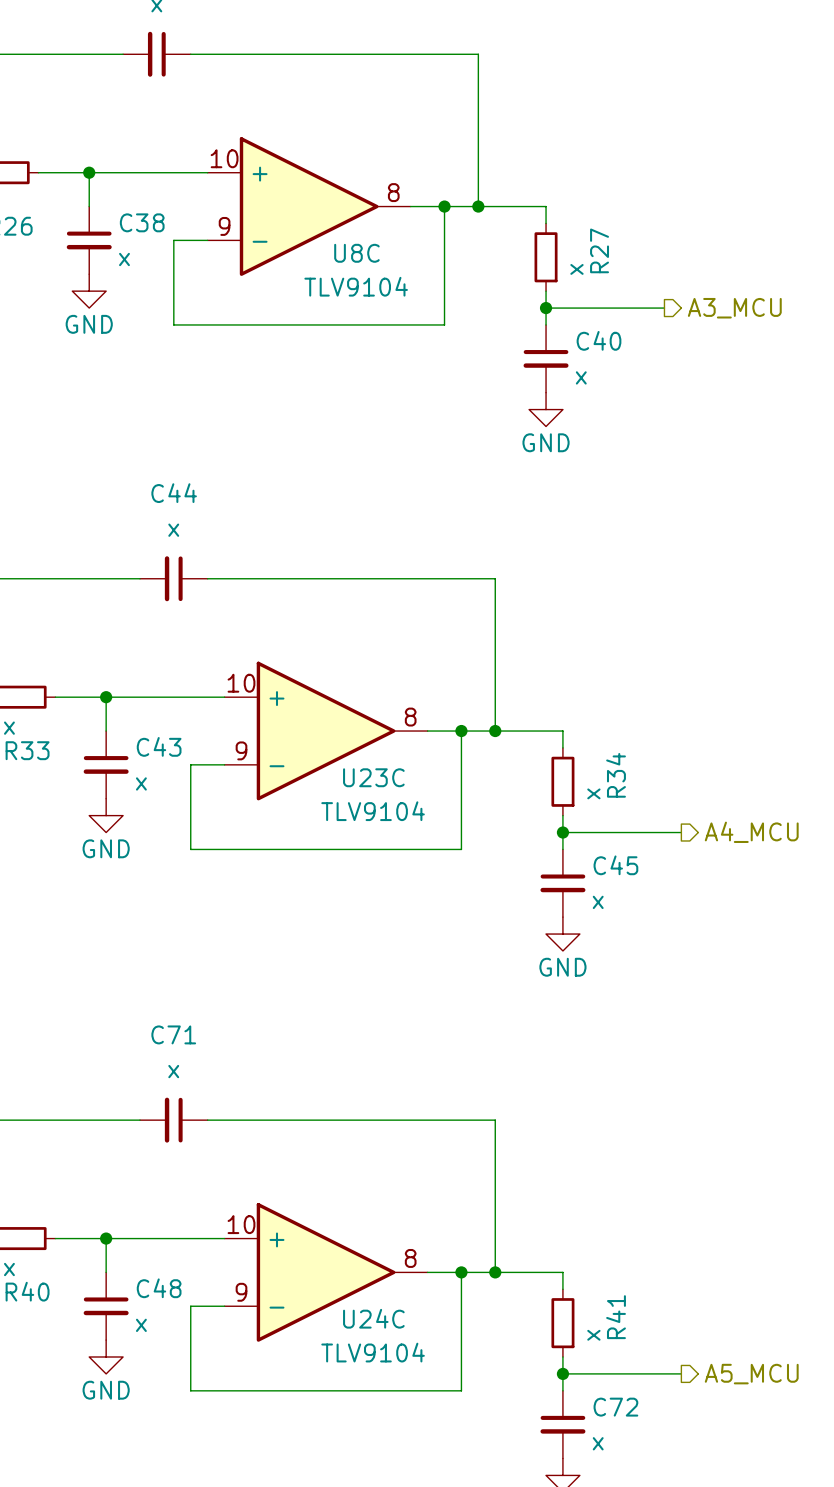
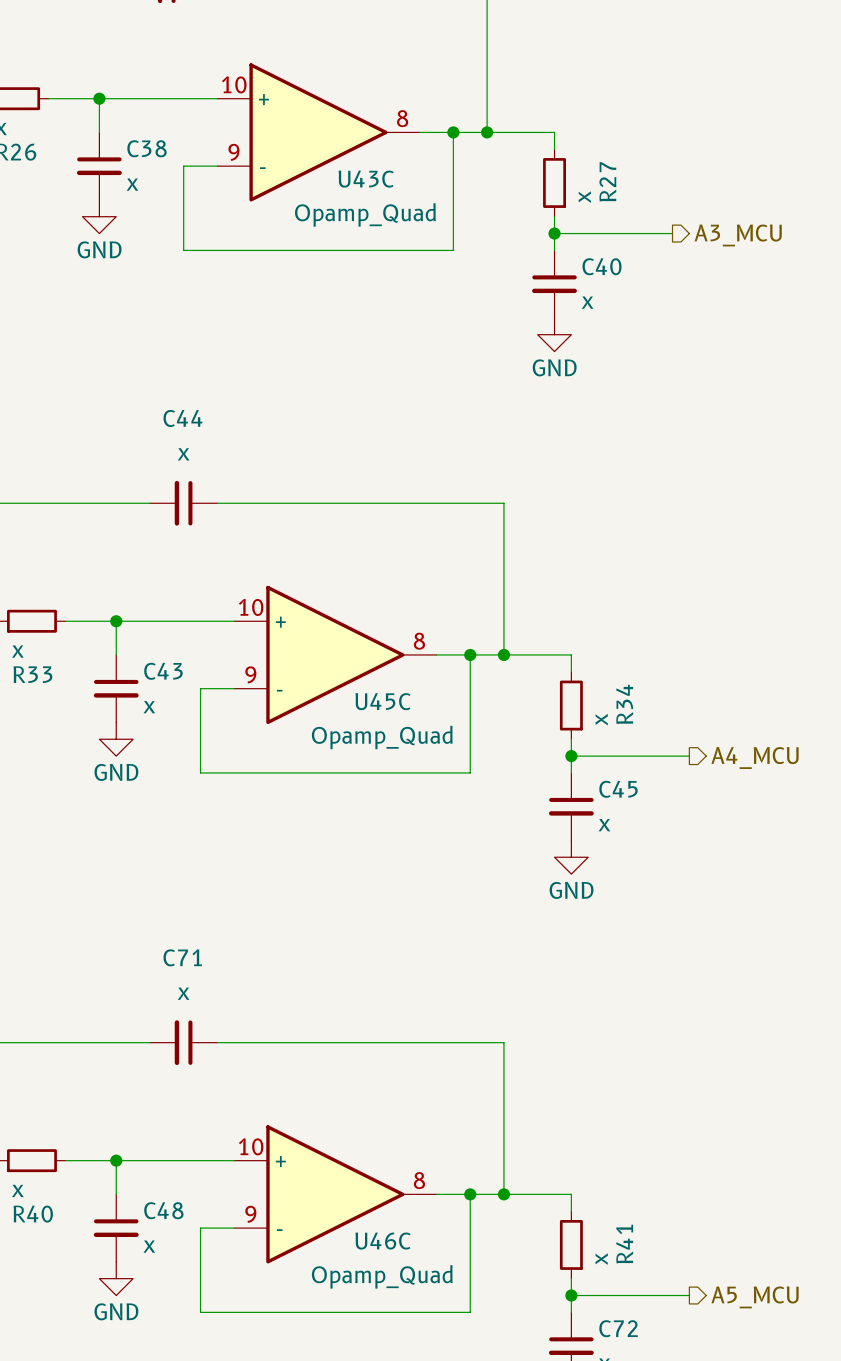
U8C name: U8C (356, 253) -> U43C (366, 179)
U8C value: TLV9104 (356, 286) -> Opamp_Quad (365, 214)
U23C name: U23C (373, 777) -> U45C (382, 701)
U23C value: TLV9104 (373, 811) -> Opamp_Quad (382, 737)
U24C name: U24C (373, 1318) -> U46C (382, 1241)
U24C value: TLV9104 (373, 1352) -> Opamp_Quad (382, 1276)

